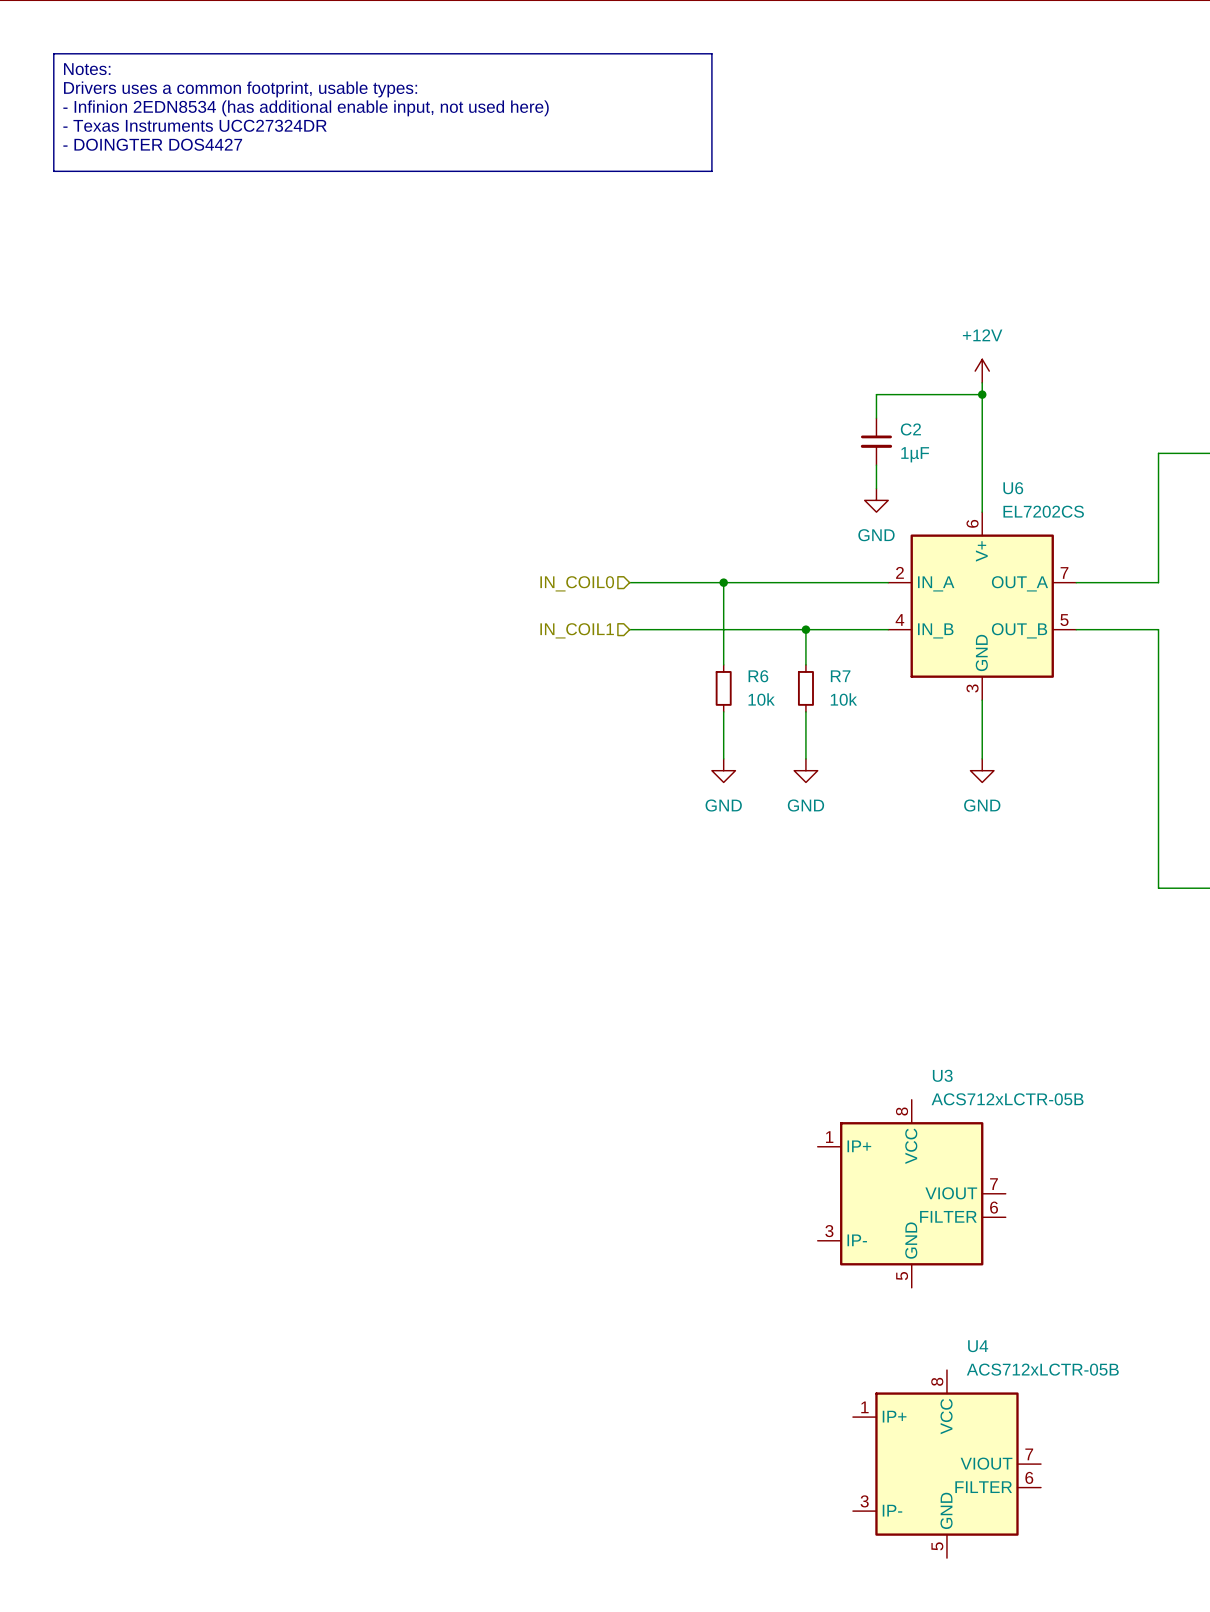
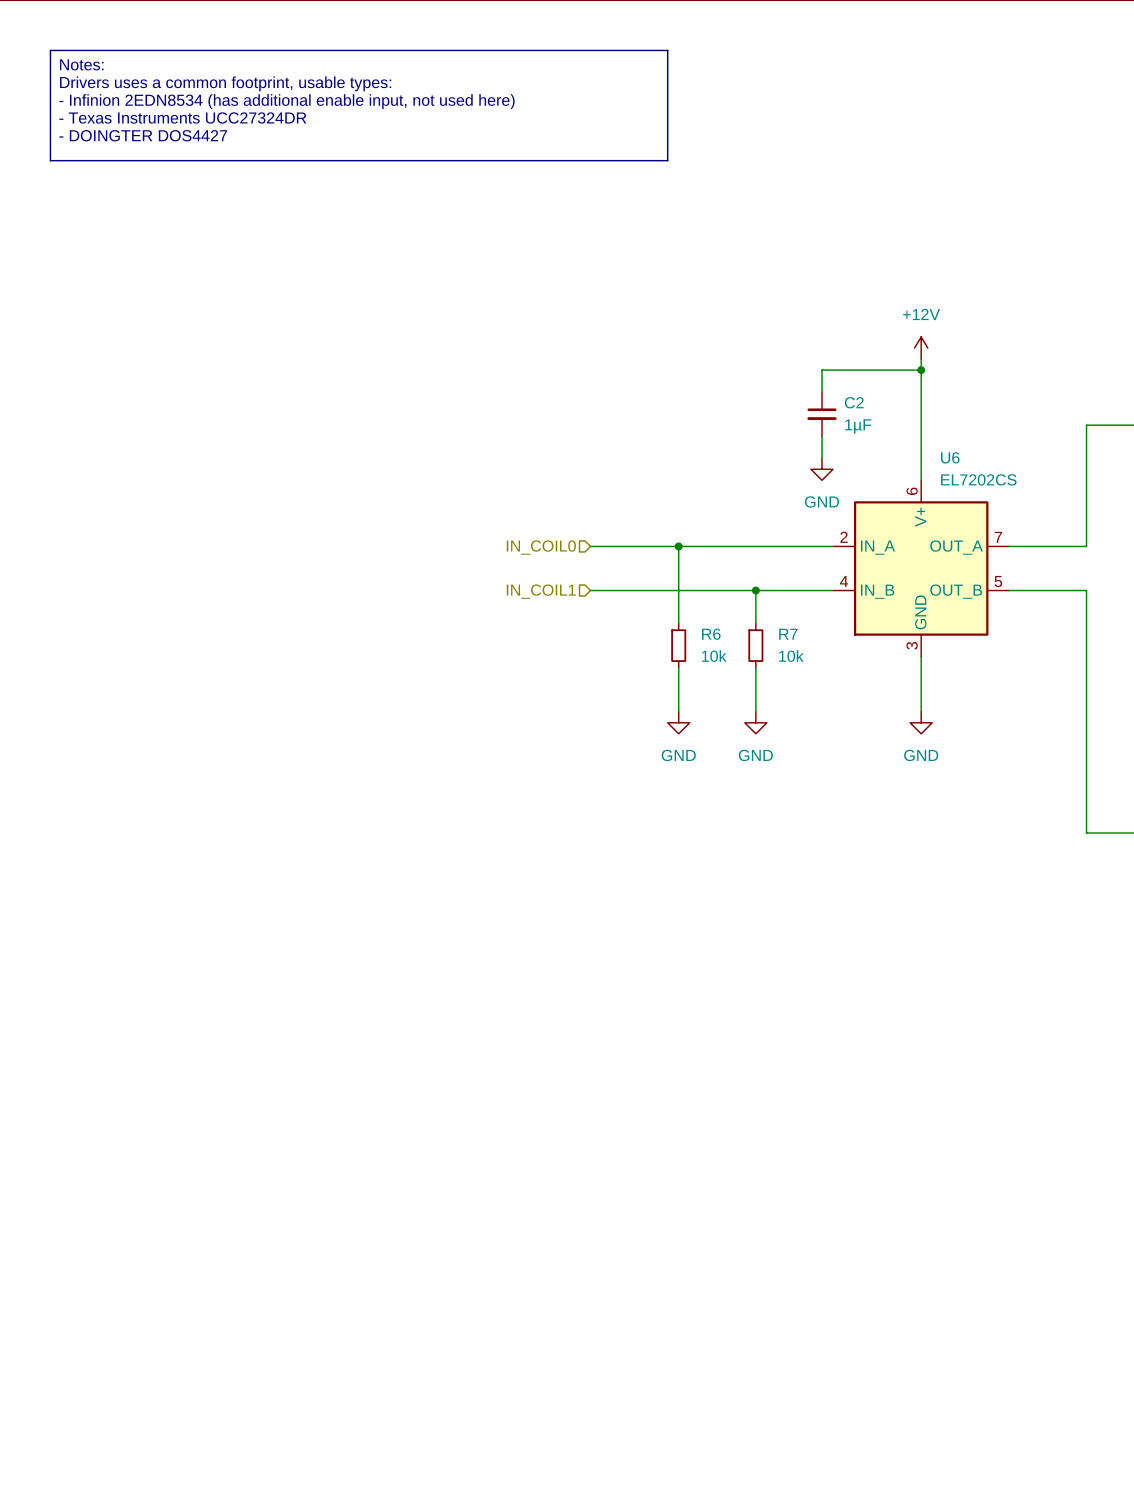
U3: ACS712xLCTR-05B (911, 1193) -> none
U4: ACS712xLCTR-05B (946, 1464) -> none

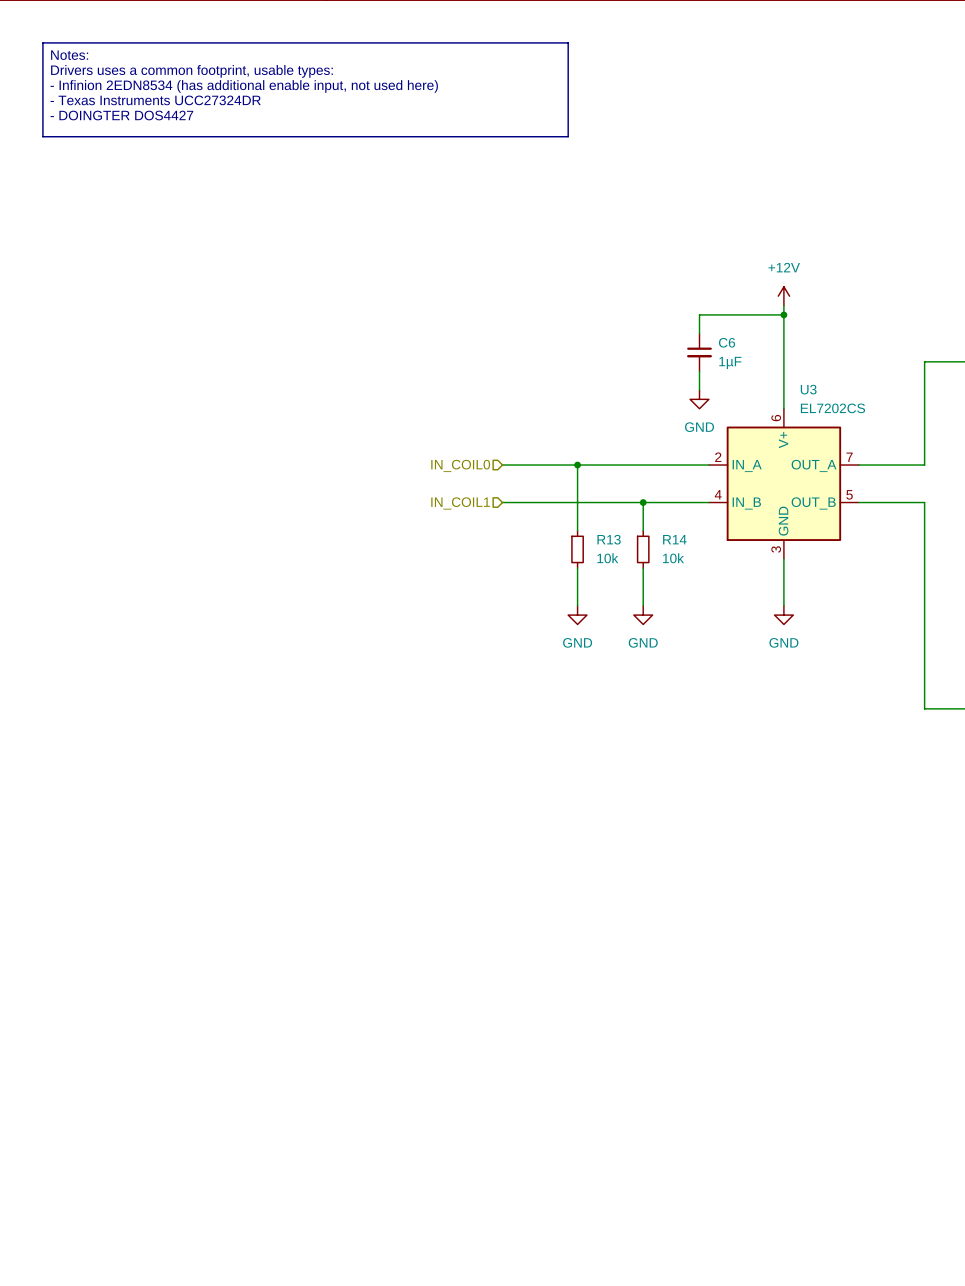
C2 name: C2 (854, 402) -> C6 (727, 342)
U6 name: U6 (950, 457) -> U3 (808, 389)
R6 name: R6 (711, 634) -> R13 (609, 539)
R7 name: R7 (788, 634) -> R14 (674, 539)

